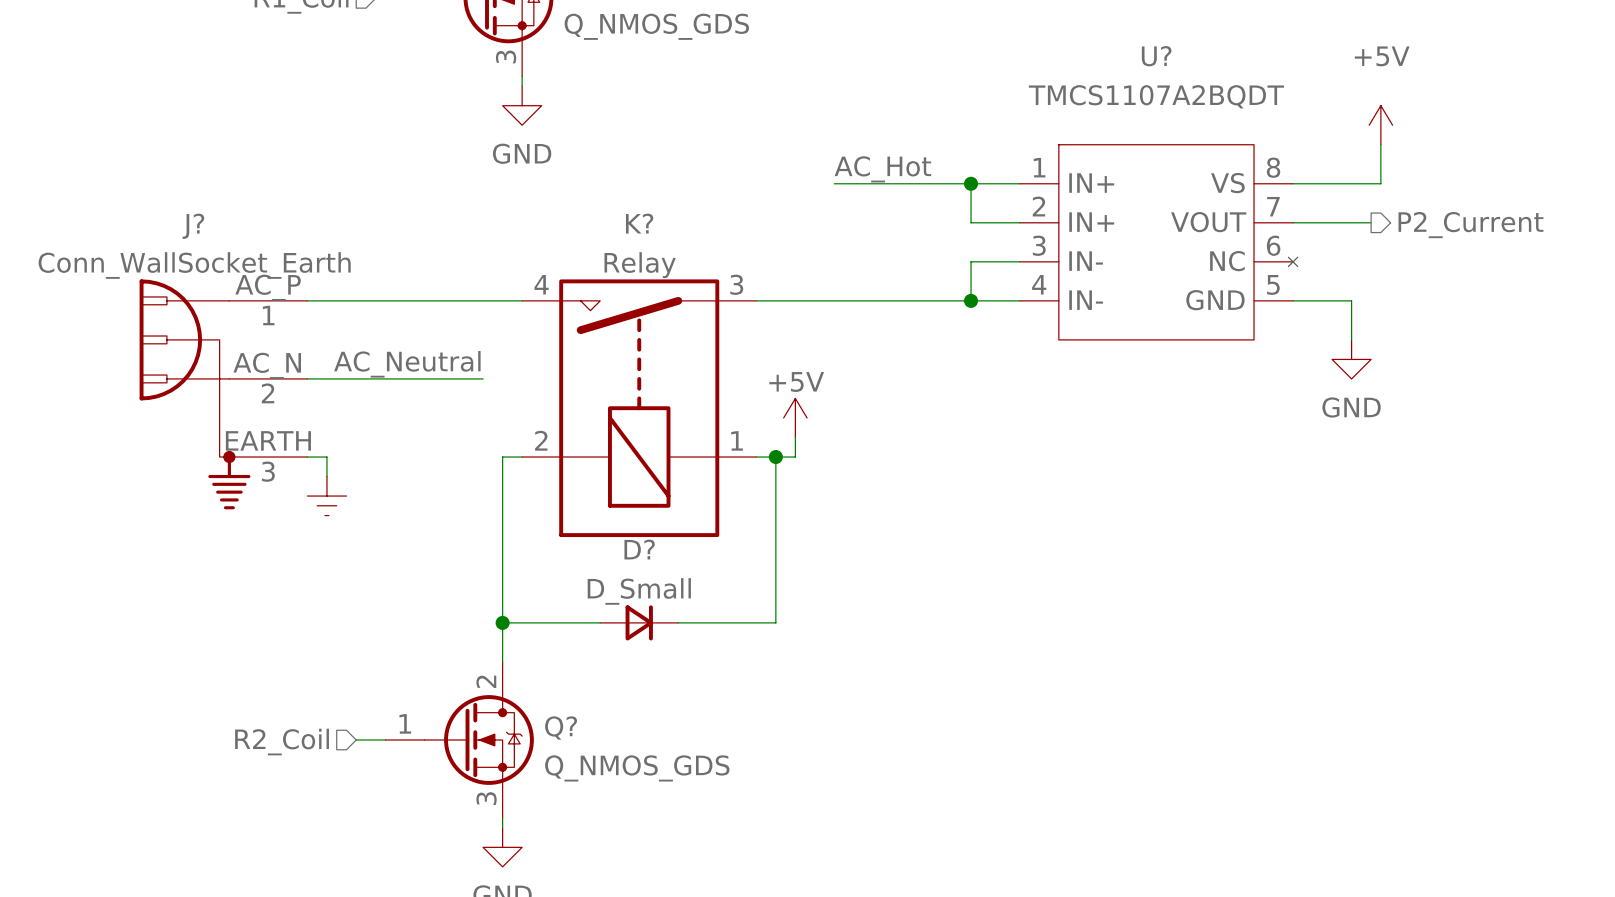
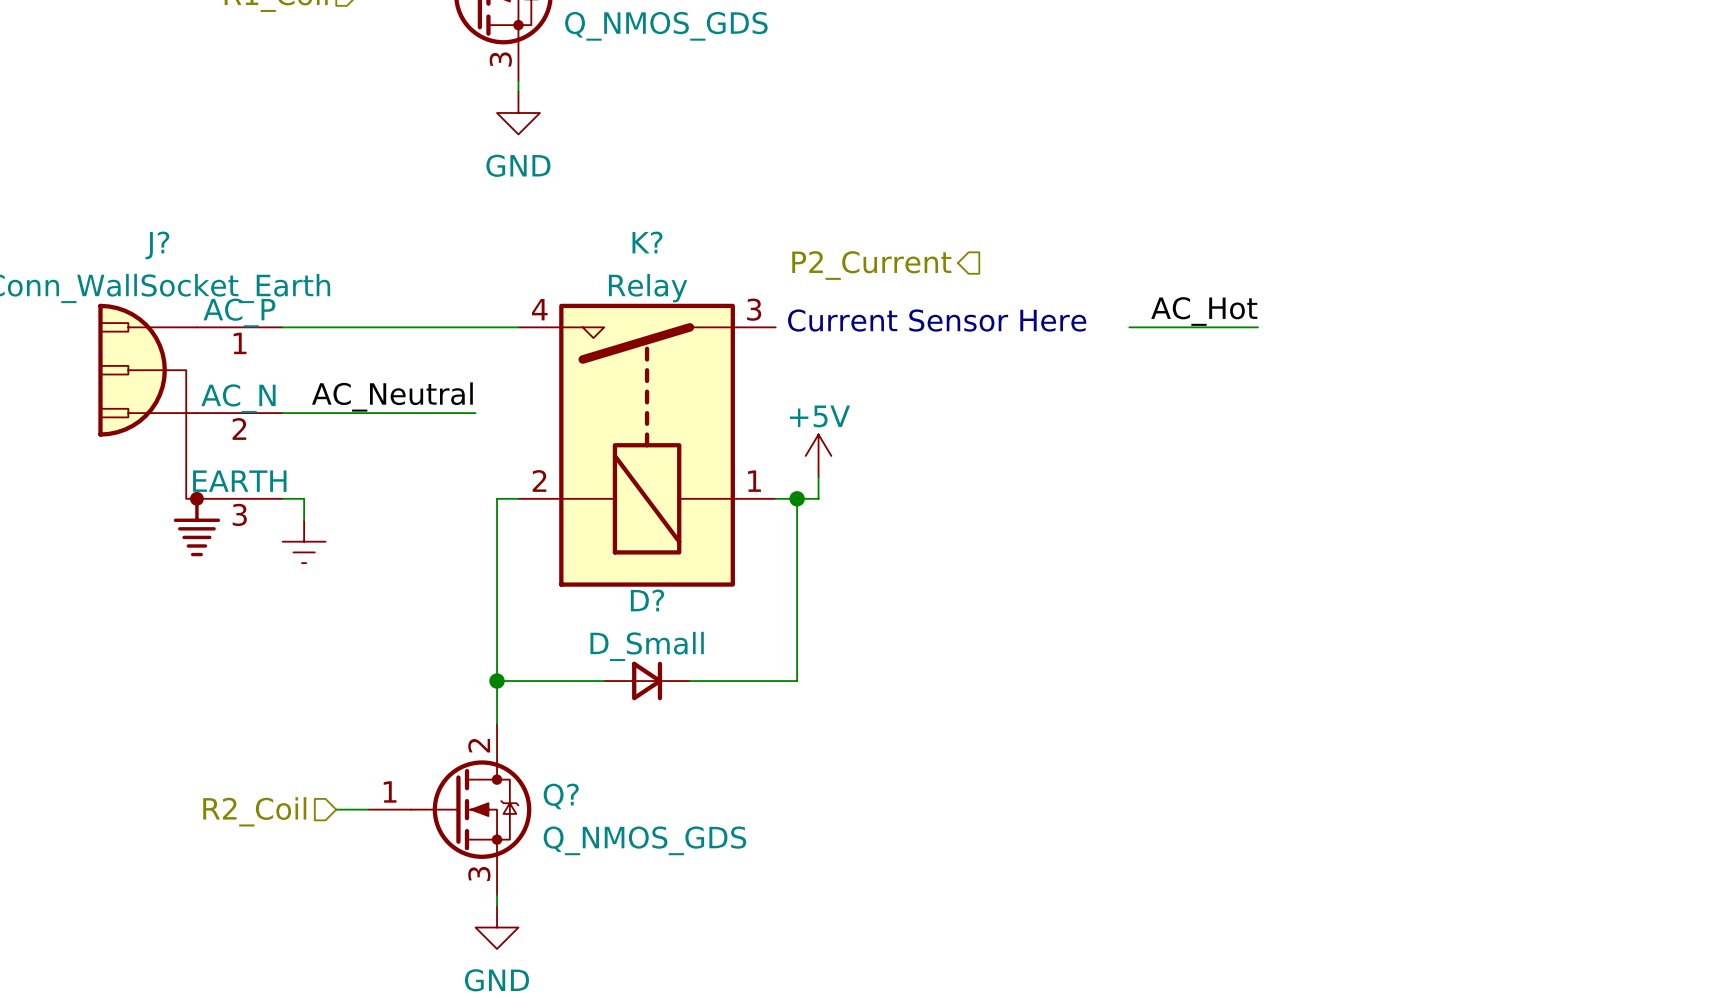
power symbol: +5V (1380, 125) -> none
wire: (1380, 144) (1380, 183) (1293, 183) -> none
label position: AC_Hot (882, 169) -> AC_Hot (1204, 311)
wire: (834, 183) (1019, 183) -> none
wire: (971, 183) (971, 222) (1019, 222) -> none
junction: (971, 183) -> none
wire: (1293, 222) (1371, 222) -> none
hierarchical label: P2_Current (1470, 225) -> none
U?: TMCS1107A2BQDT (1158, 242) -> none
hierarchical label: none -> P2_Current (871, 265)
wire: (1019, 261) (971, 261) (971, 300) -> none
text: none -> Current Sensor Here (937, 320)
wire: (756, 300) (1019, 300) -> none
junction: (971, 300) -> none
wire: none -> (1129, 327) (1257, 327)
wire: (1293, 300) (1351, 300) (1351, 339) -> none
power symbol: GND (1351, 359) -> none

